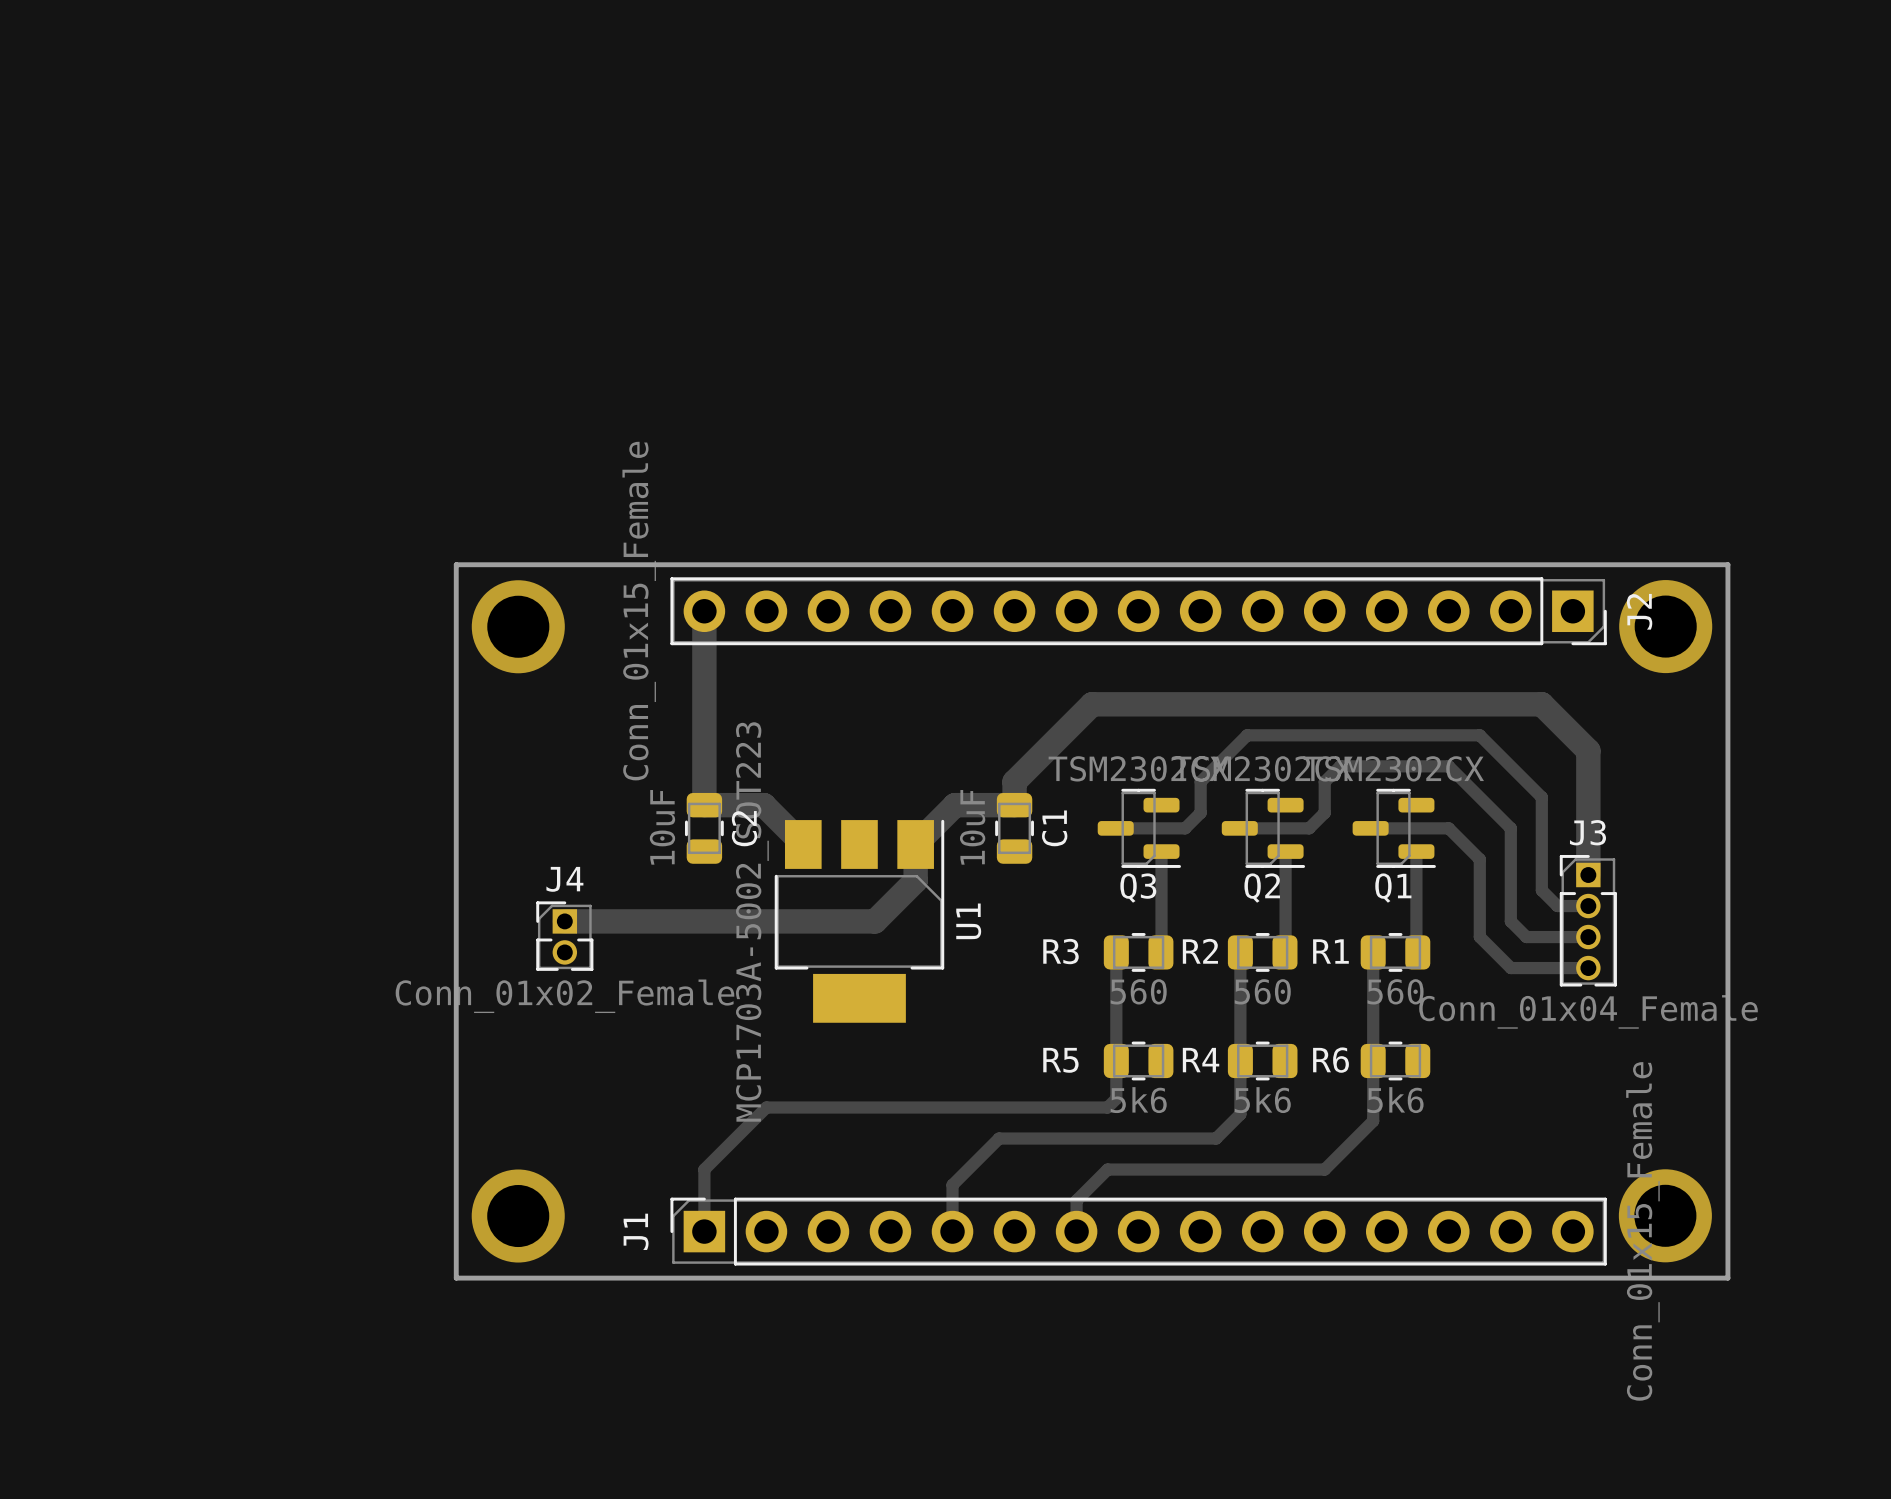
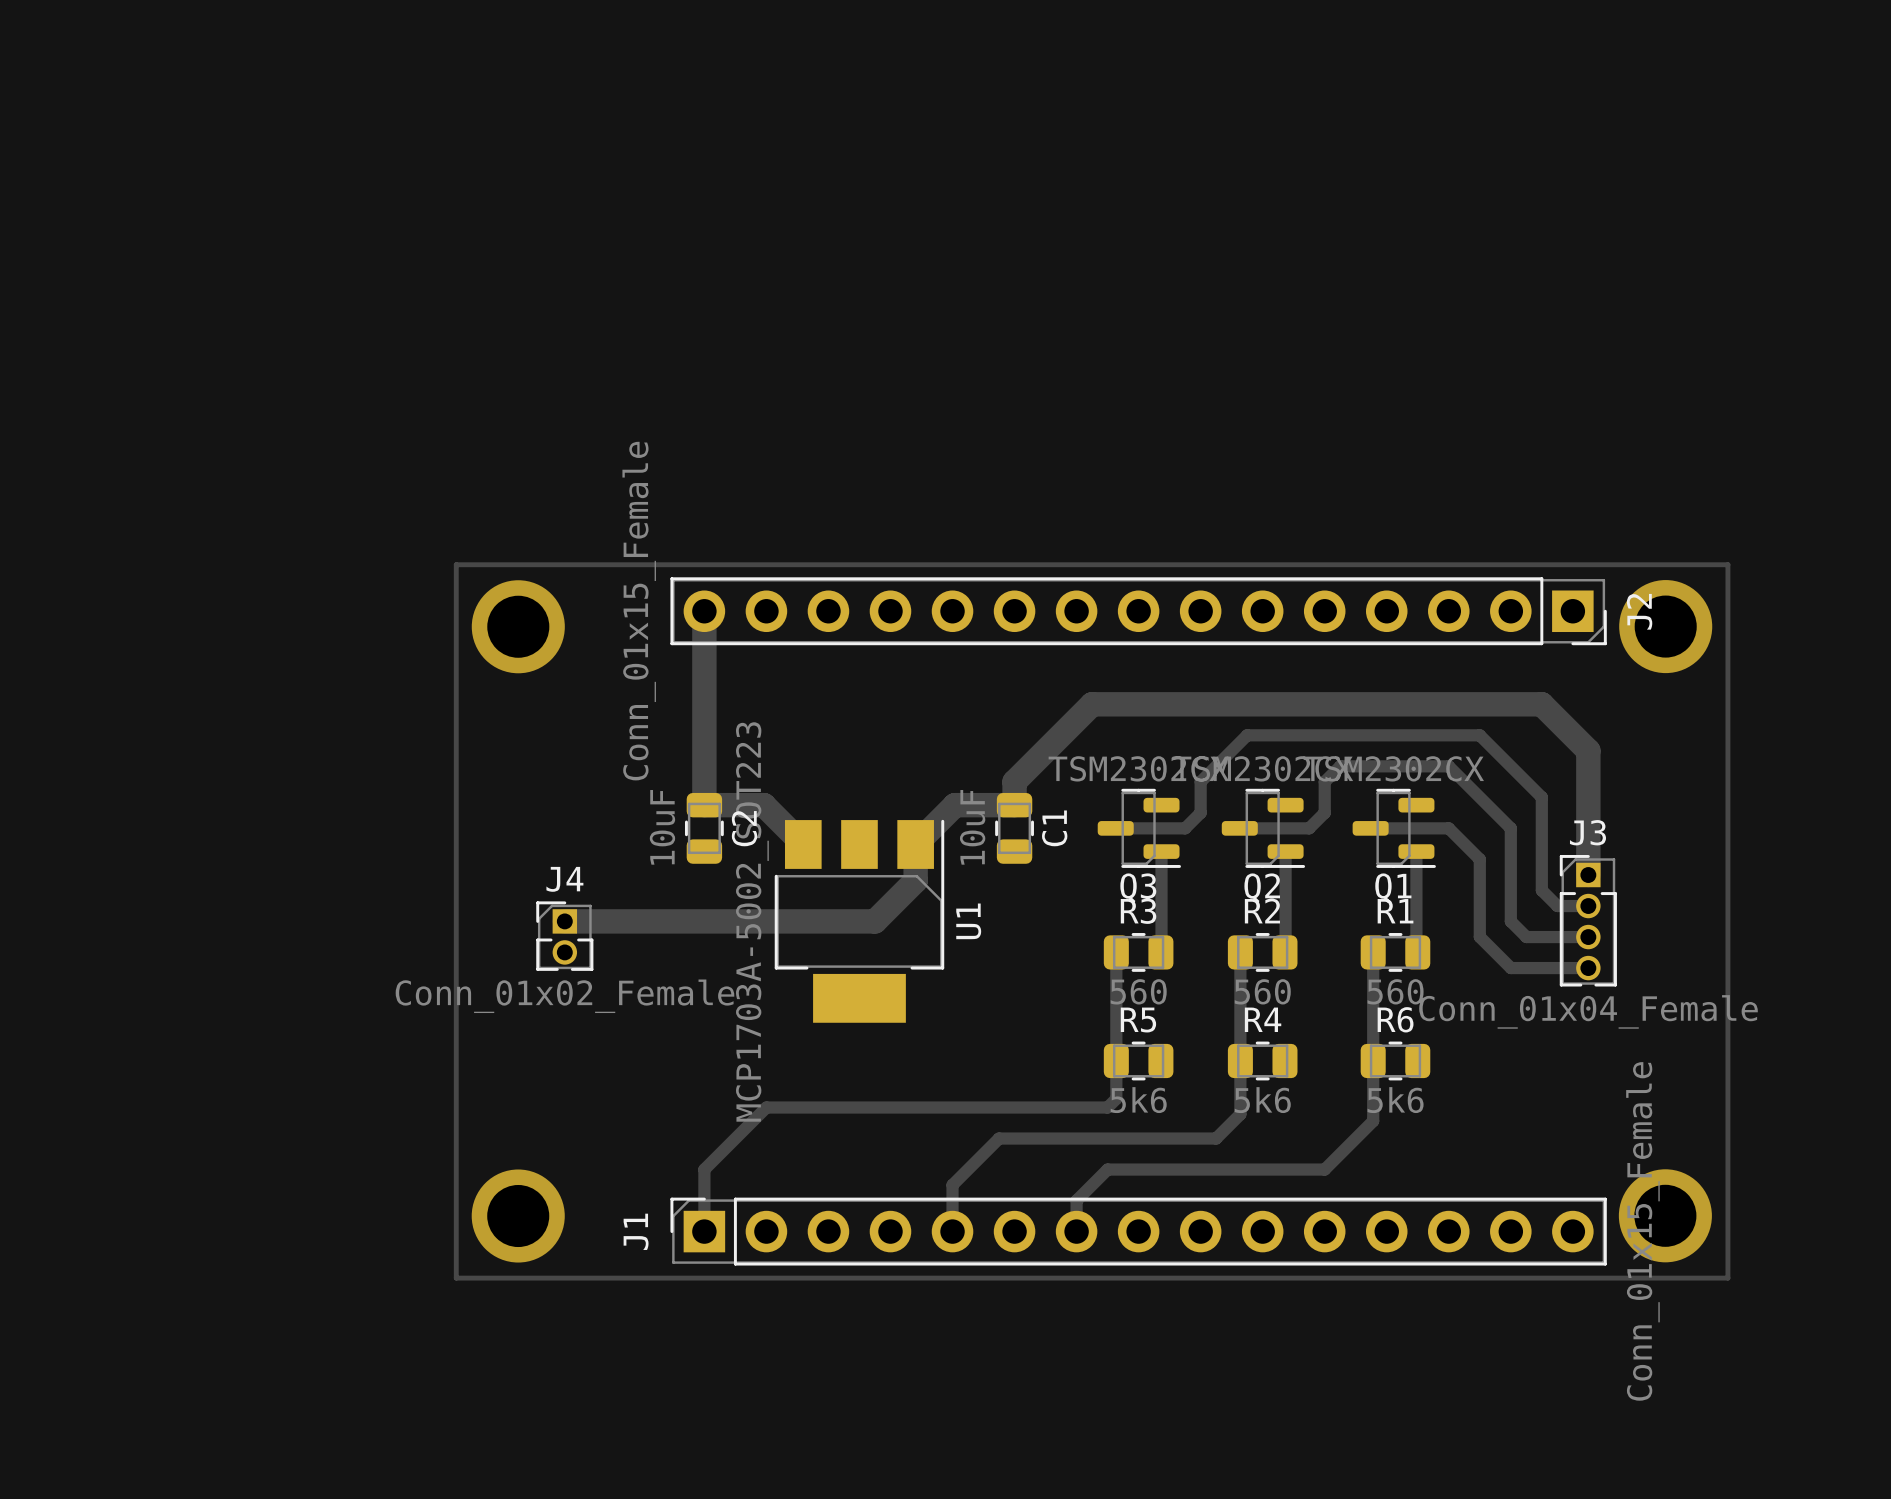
board edge: (456, 564) (1727, 564) (1727, 1278) (456, 1278) (456, 564) -> none
track: none -> (456, 564) (1727, 564) (1727, 1278) (456, 1278) (456, 564)
R3 name position: R3 (1060, 951) -> R3 (1138, 911)
R2 name position: R2 (1200, 951) -> R2 (1262, 911)
R1 name position: R1 (1330, 951) -> R1 (1395, 911)
R5 name position: R5 (1060, 1060) -> R5 (1138, 1020)
R4 name position: R4 (1201, 1060) -> R4 (1263, 1019)
R6 name position: R6 (1331, 1060) -> R6 (1395, 1019)

